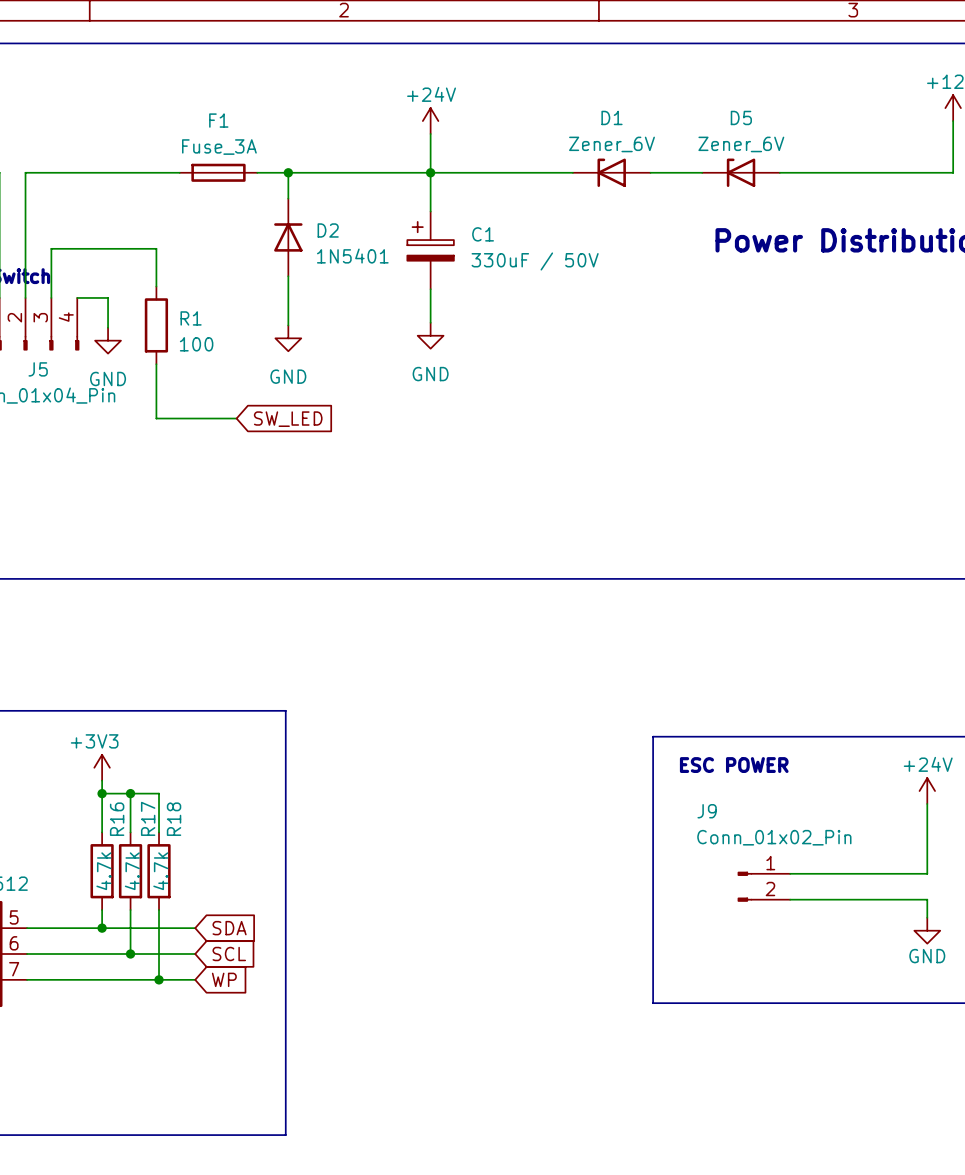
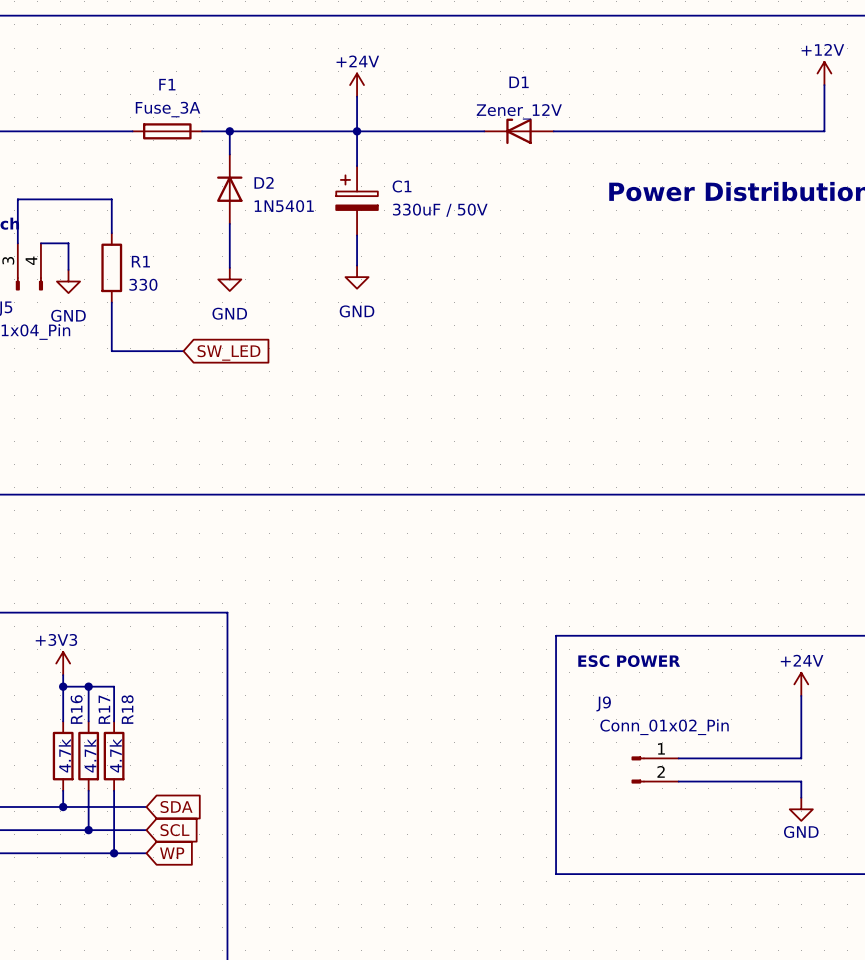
D1 value: Zener_6V (612, 144) -> Zener_12V (519, 111)
D5: Zener_6V (741, 172) -> none
R1 value: 100 (196, 344) -> 330 (143, 284)

